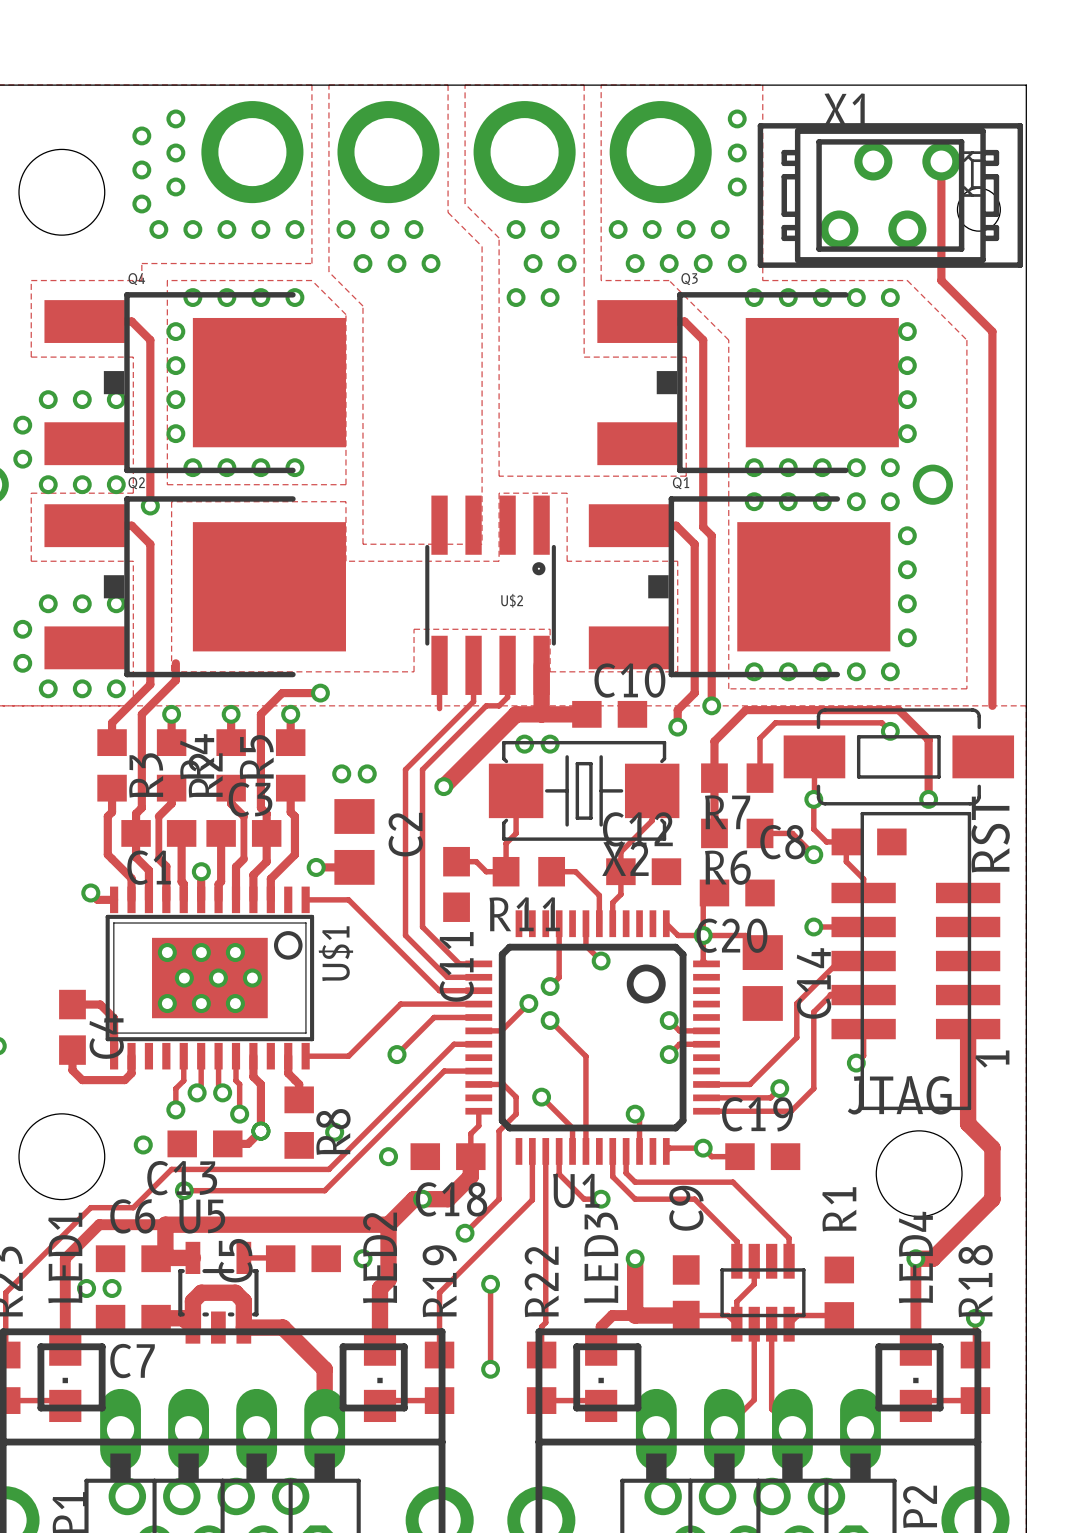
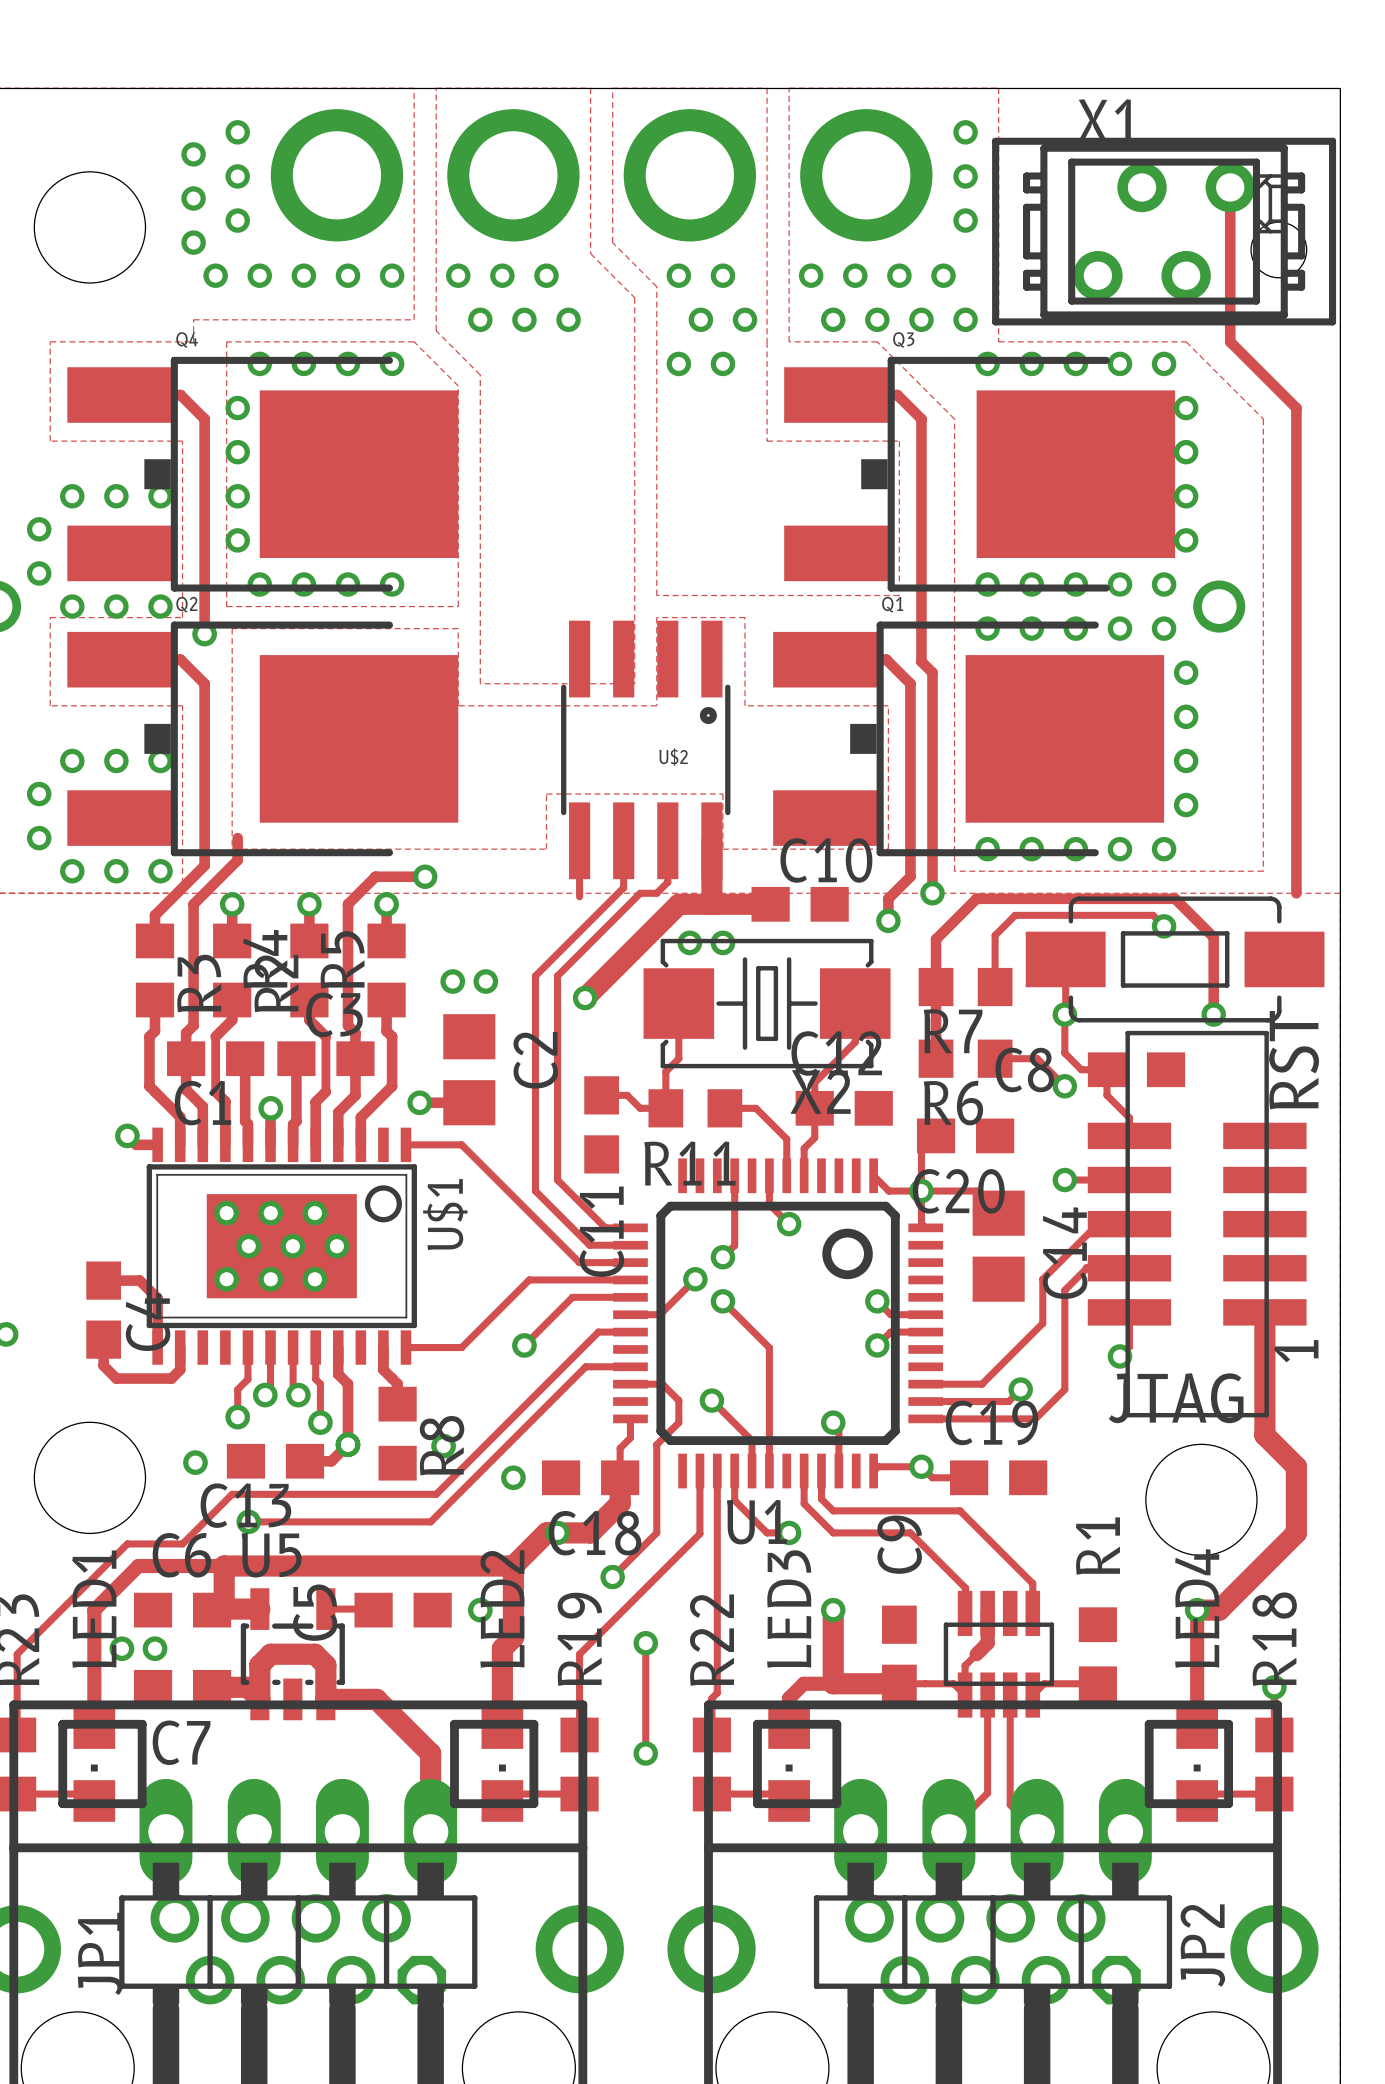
track width: thin (754, 1261) (754, 1284) (745, 1292) -> thick (987, 1613) (987, 1643) (976, 1654)

